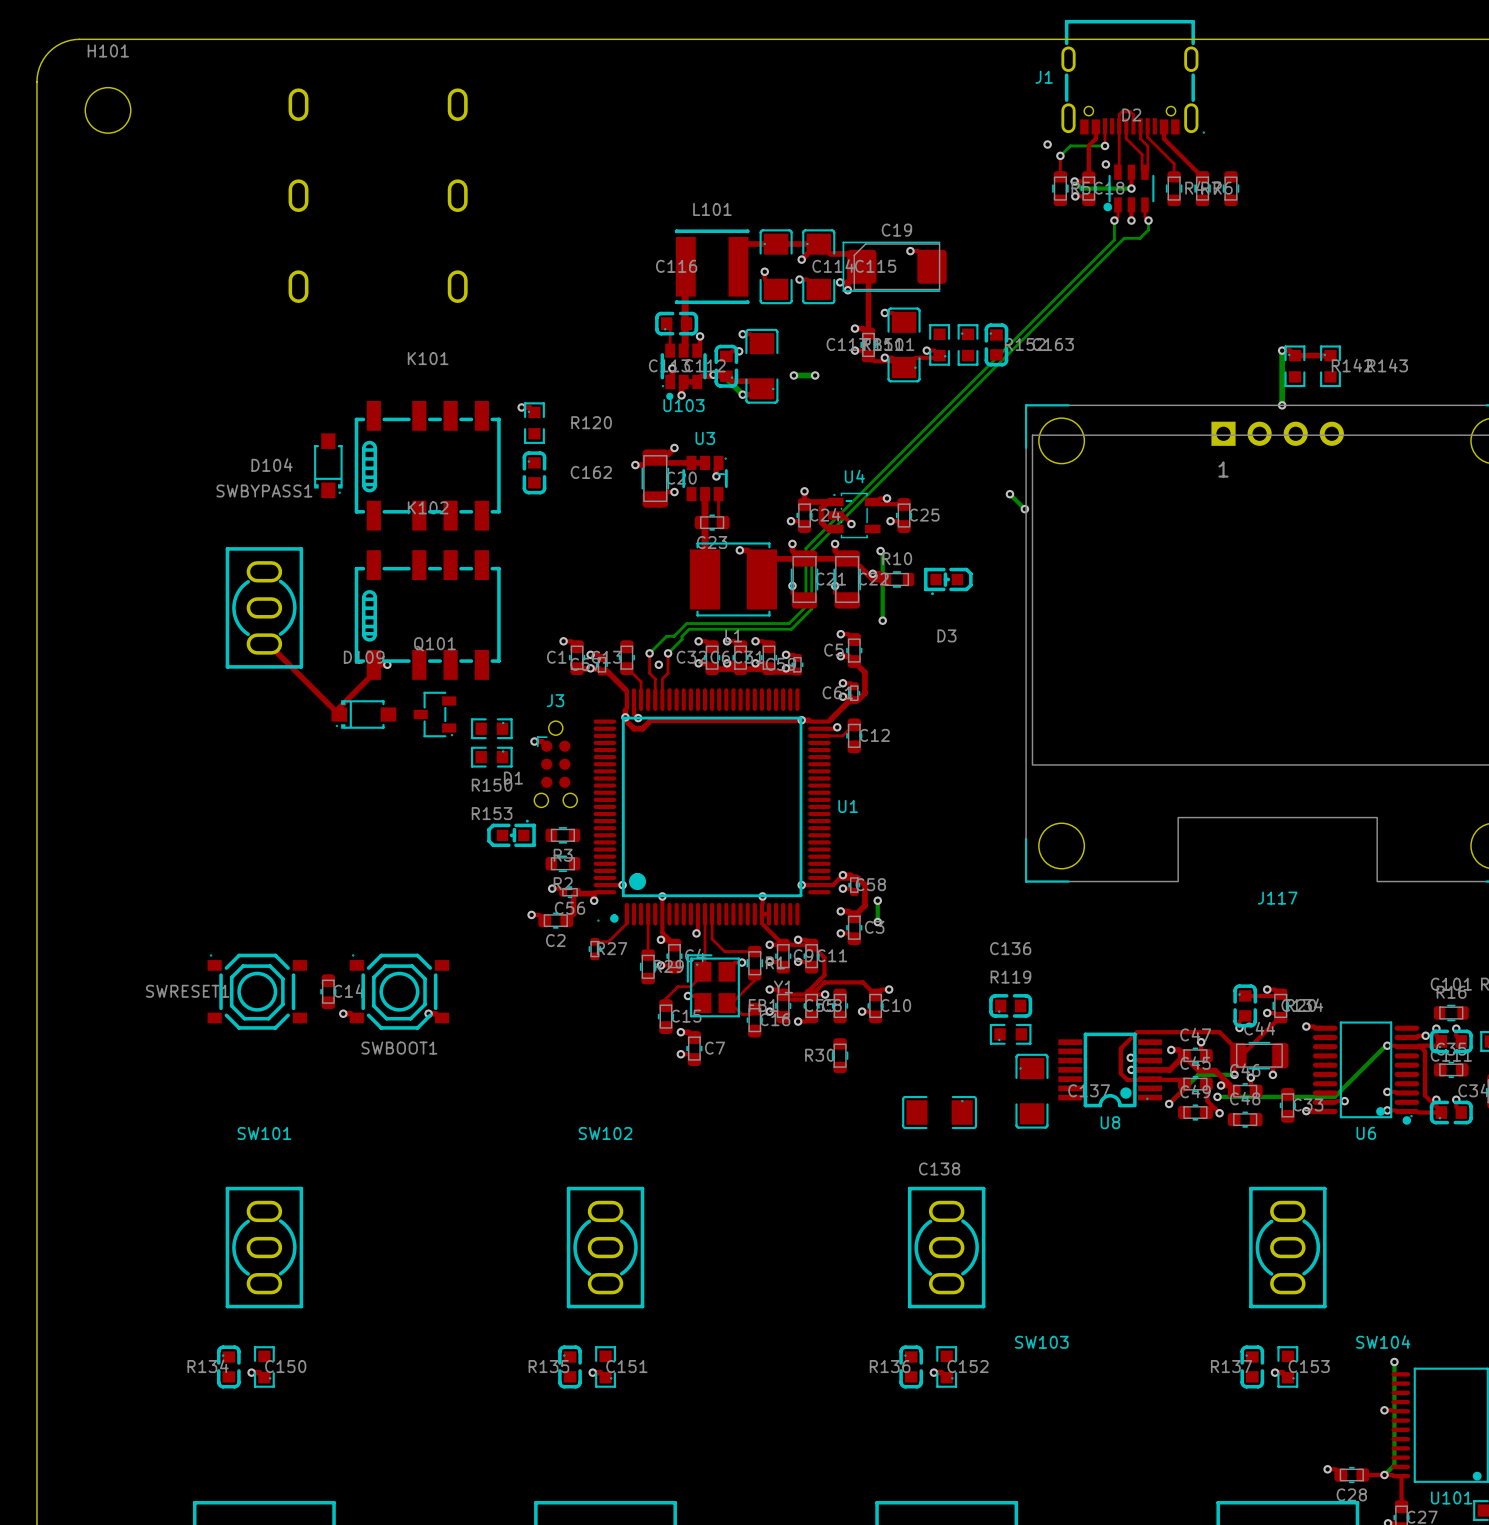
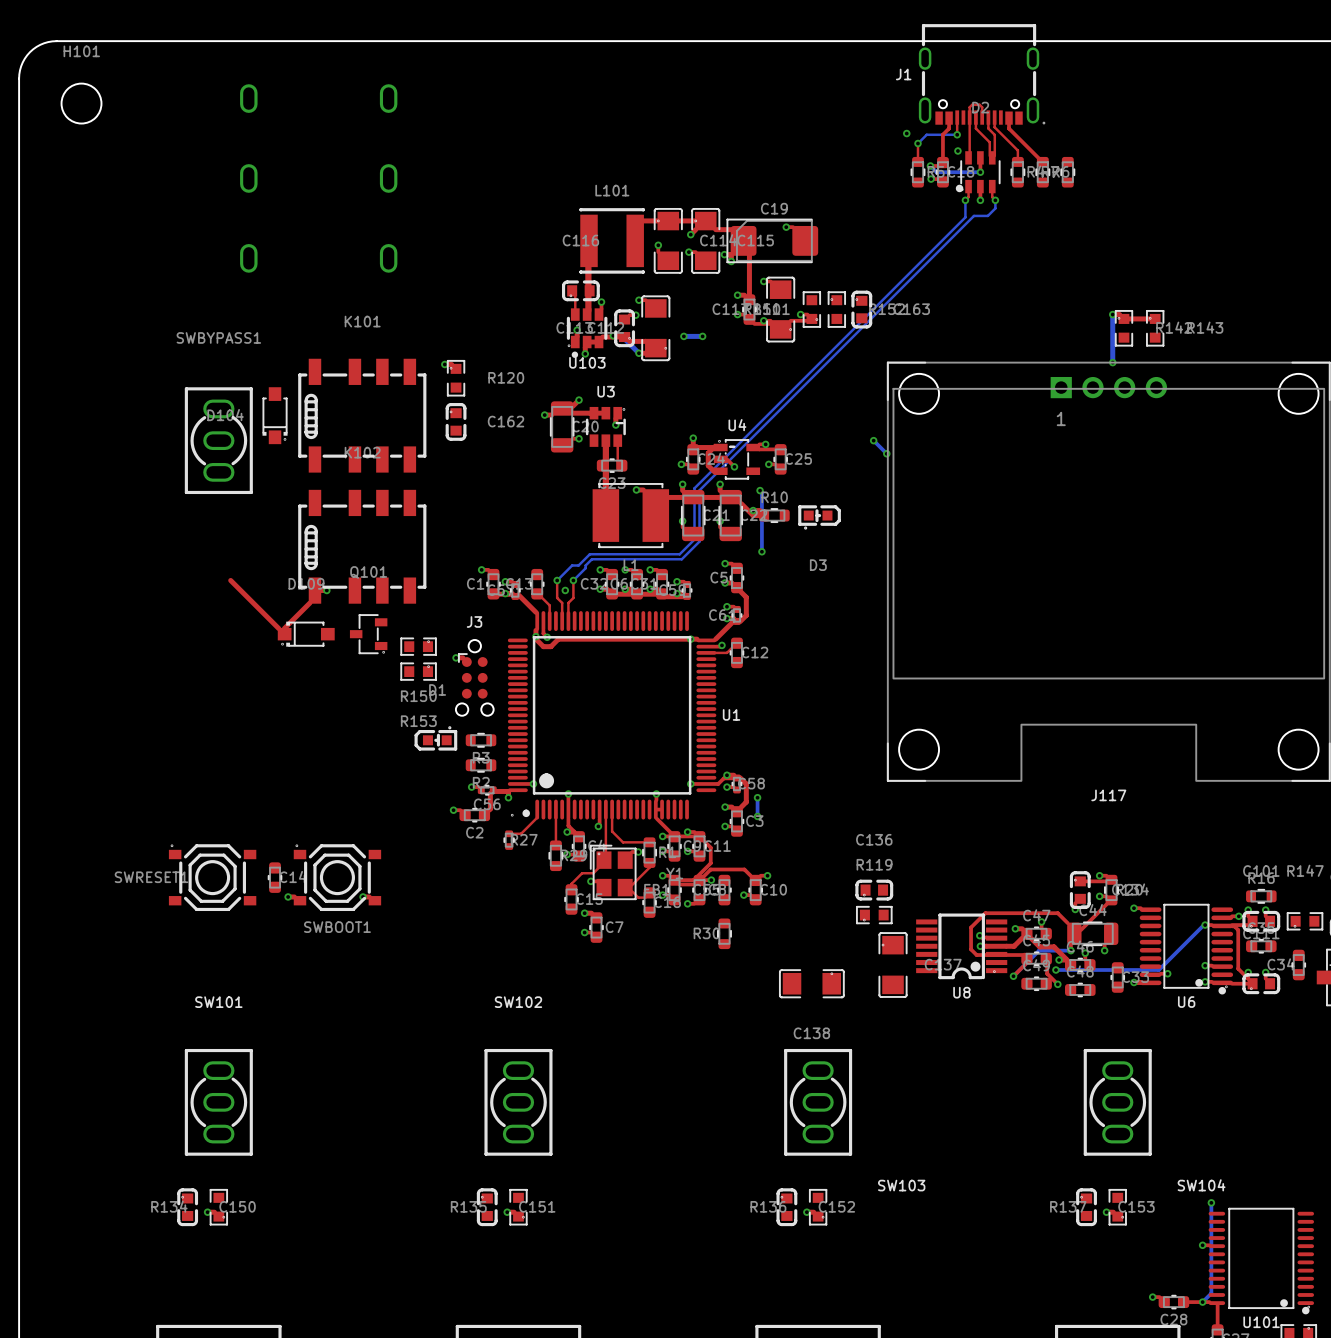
SWBYPASS1 position: (264, 607) -> (218, 440)

